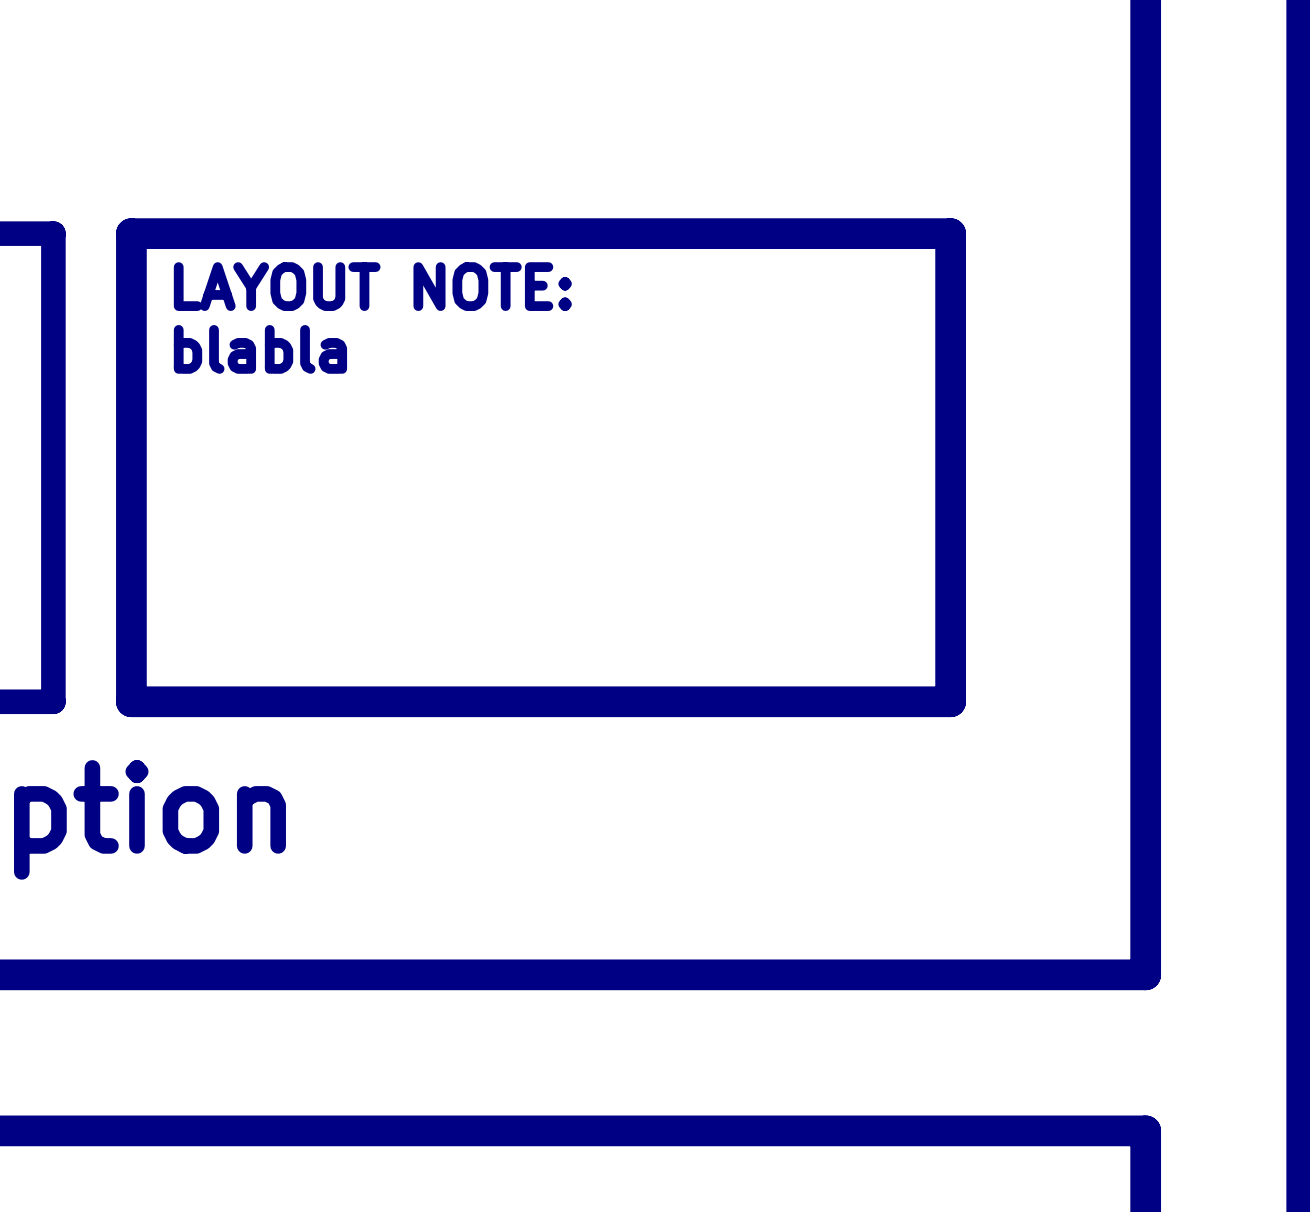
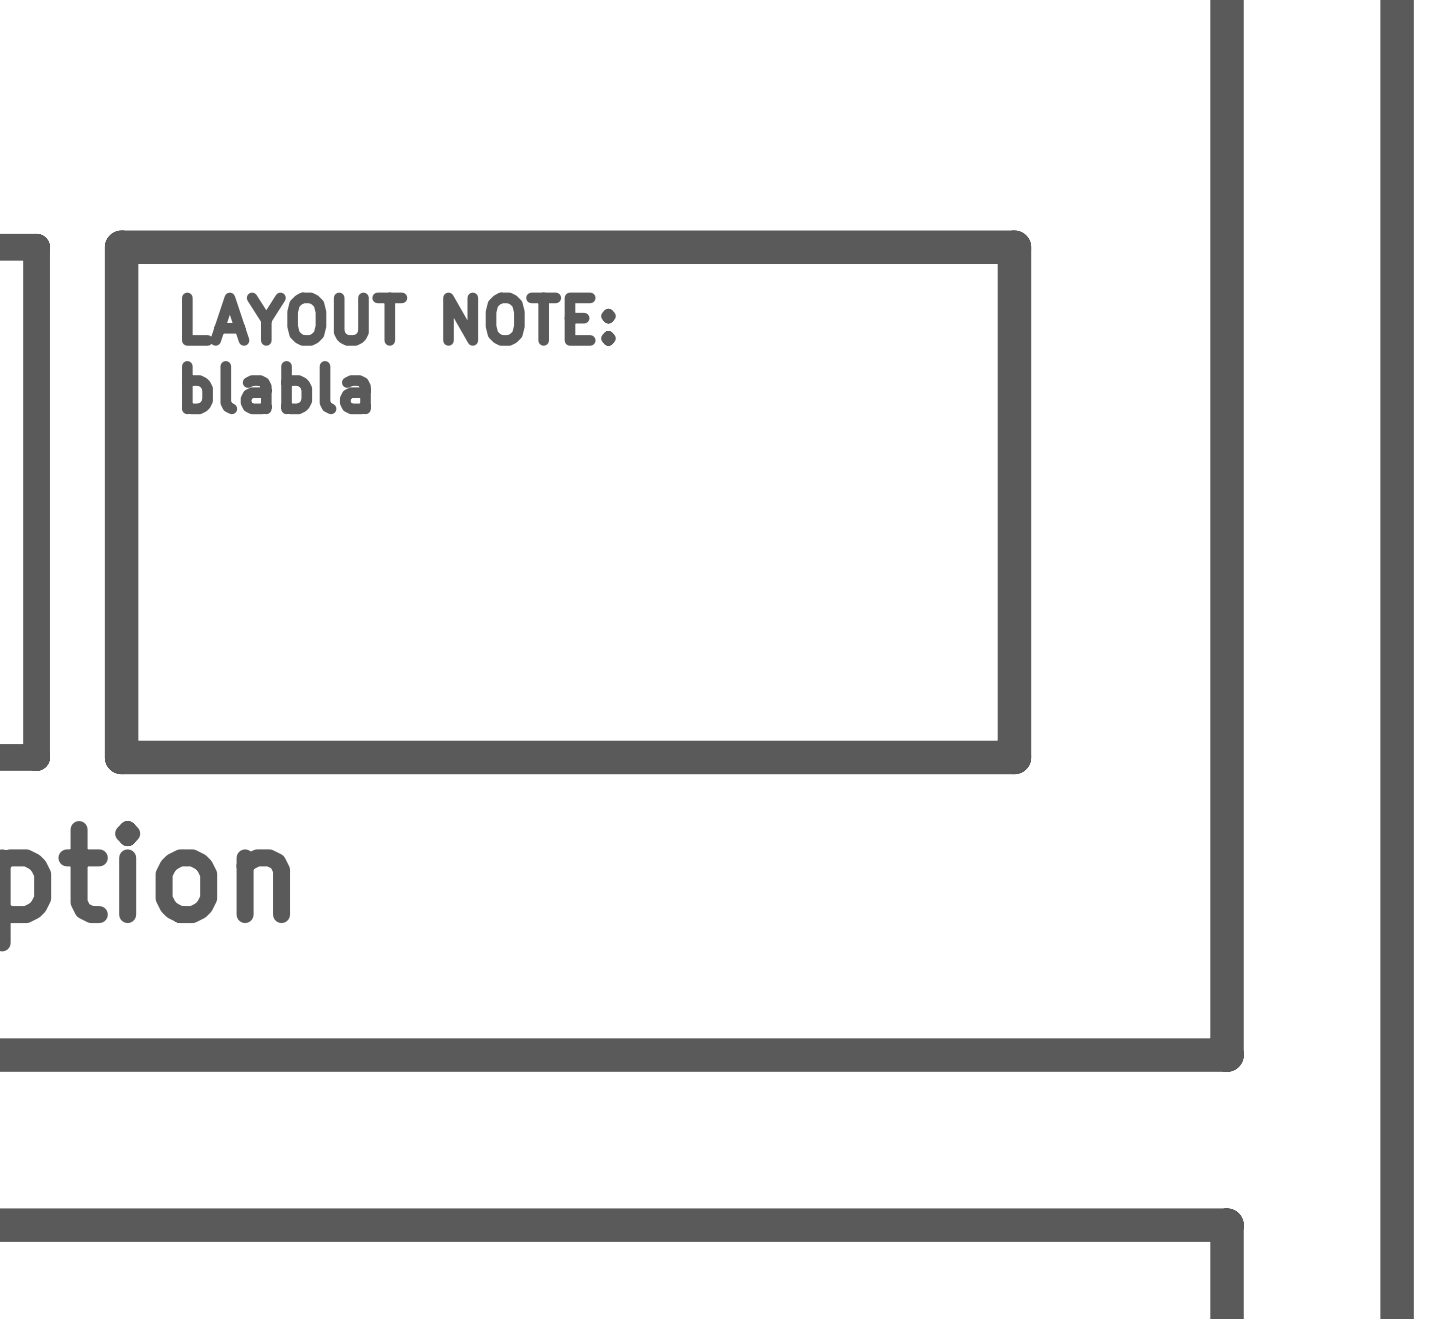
text position: LAYOUT NOTE: (372, 286) -> LAYOUT NOTE: (398, 319)
text position: blabla (260, 349) -> blabla (276, 387)

